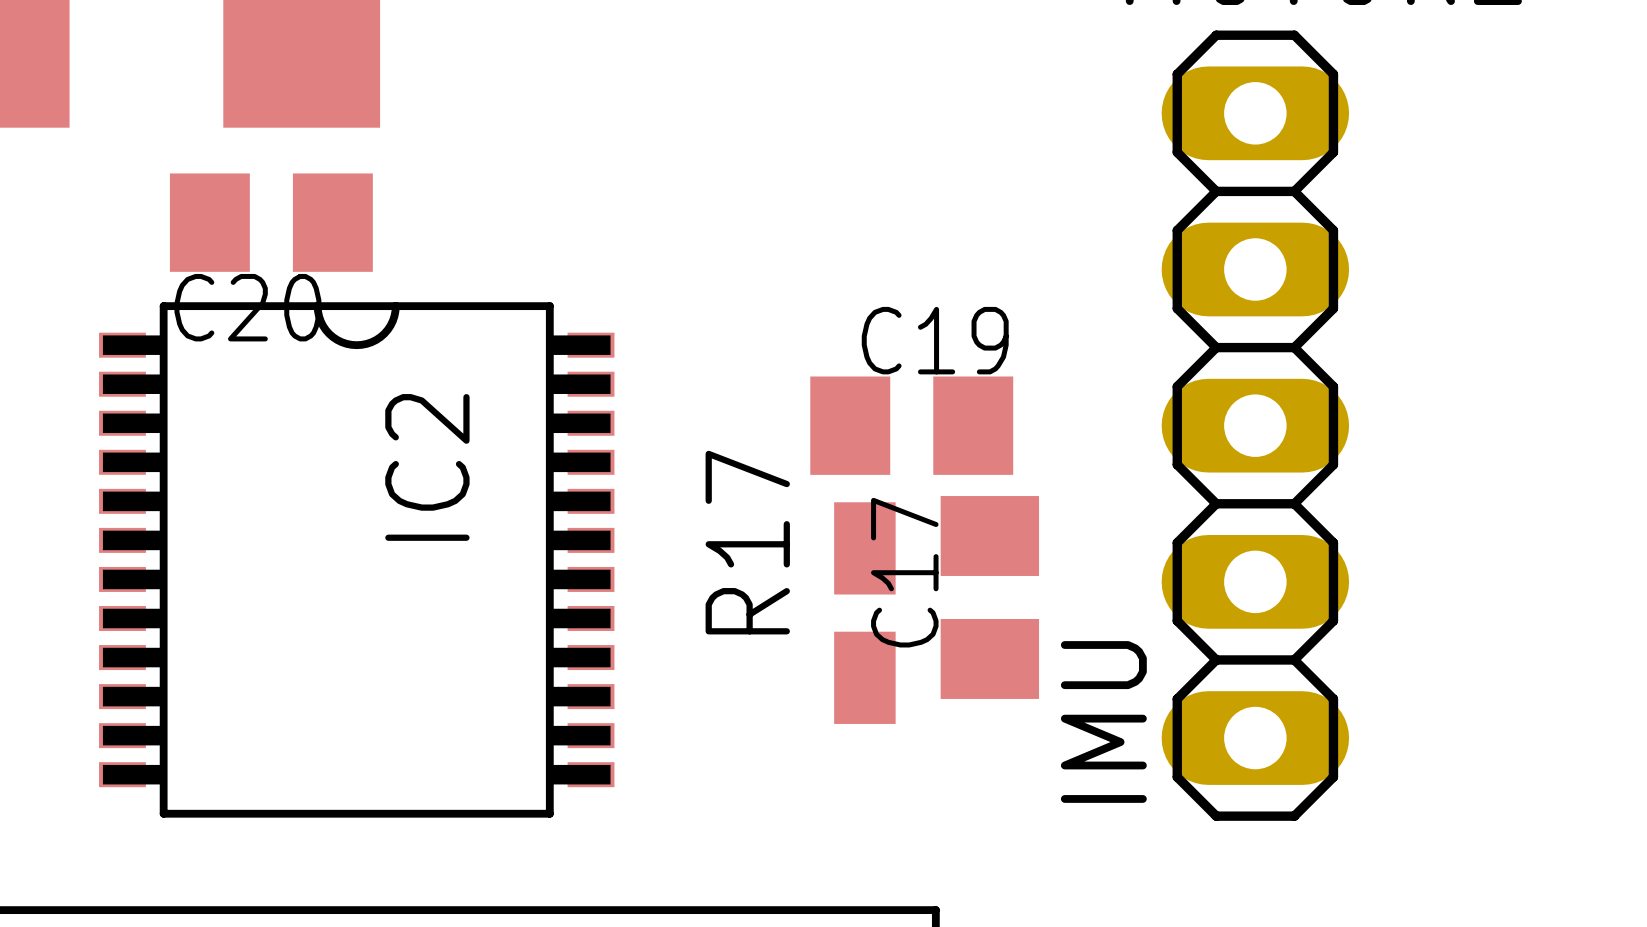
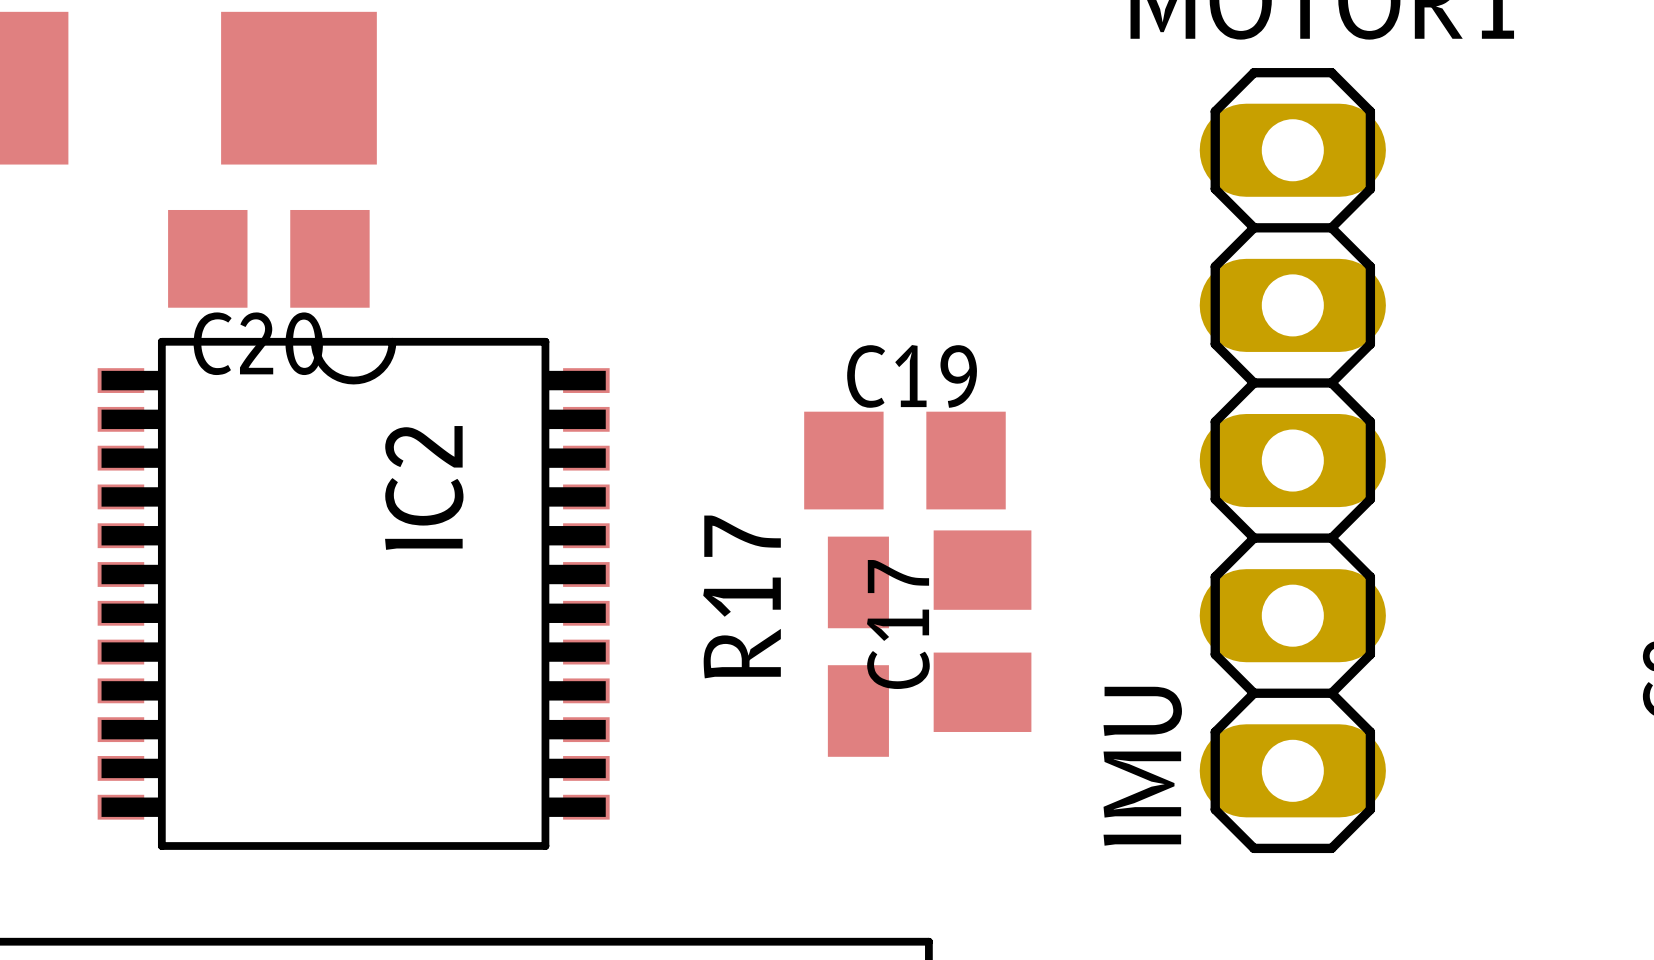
IMU position: (1255, 425) -> (1292, 460)

